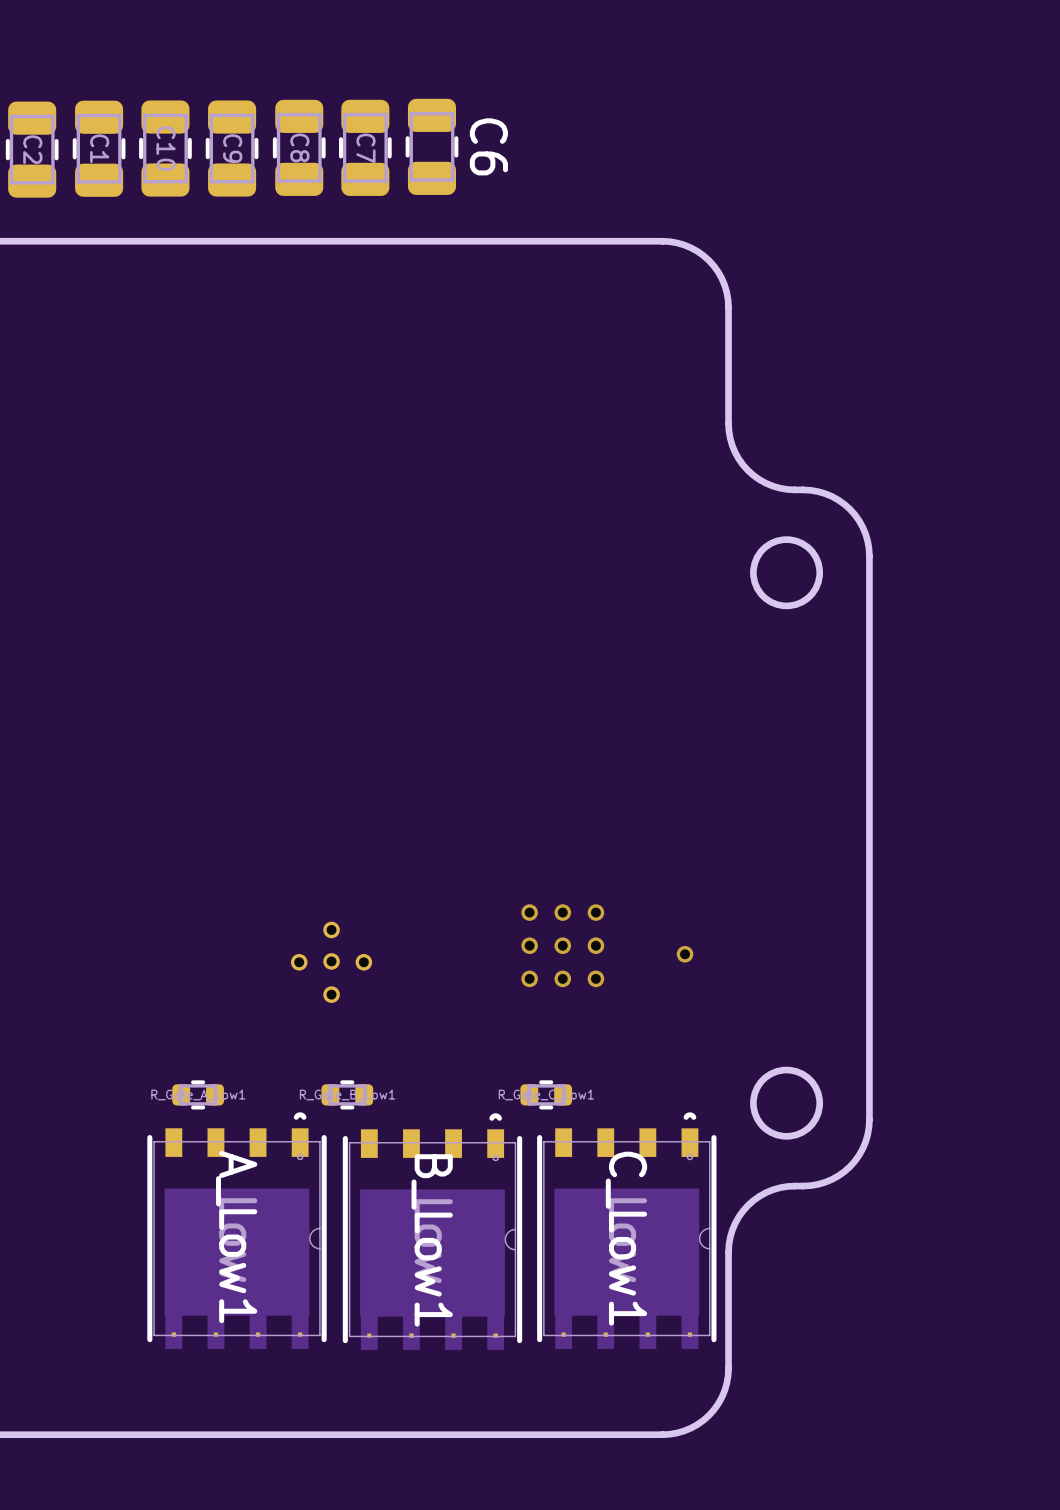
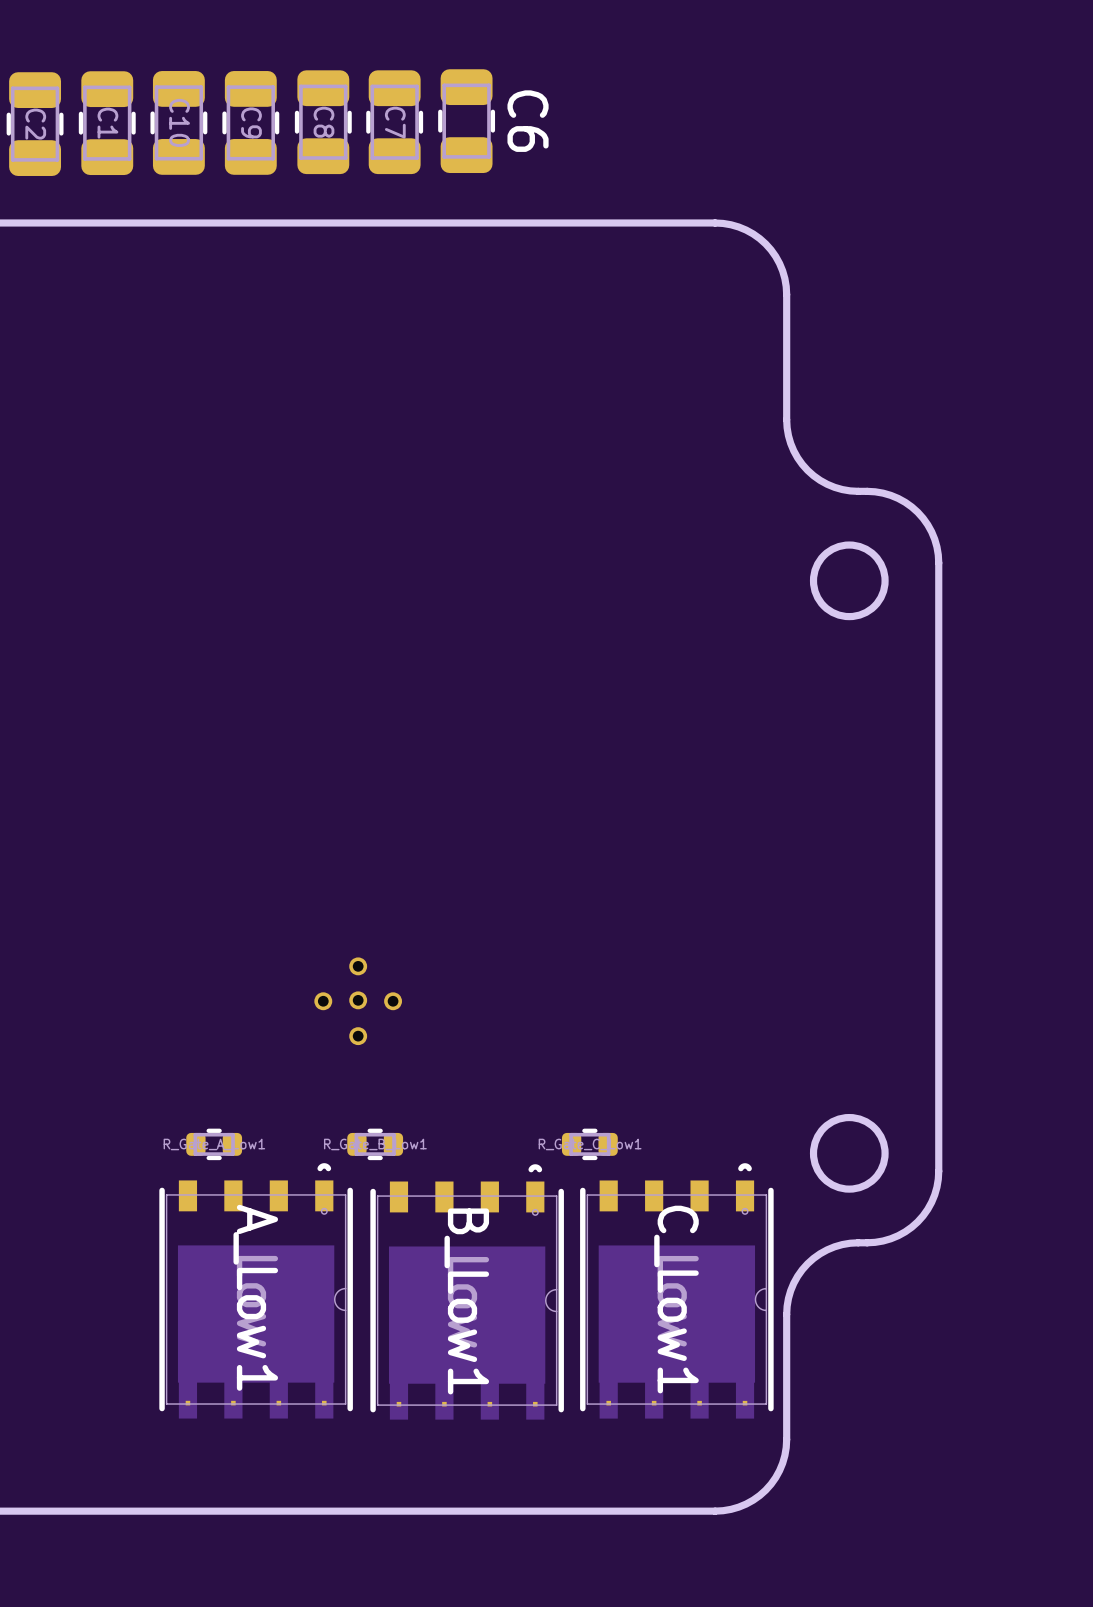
via: (529, 912) -> none
via: (562, 912) -> none
via: (595, 912) -> none
via: (529, 945) -> none
via: (562, 945) -> none
via: (595, 945) -> none
via: (685, 954) -> none
via: (529, 978) -> none
via: (562, 978) -> none
via: (595, 978) -> none

